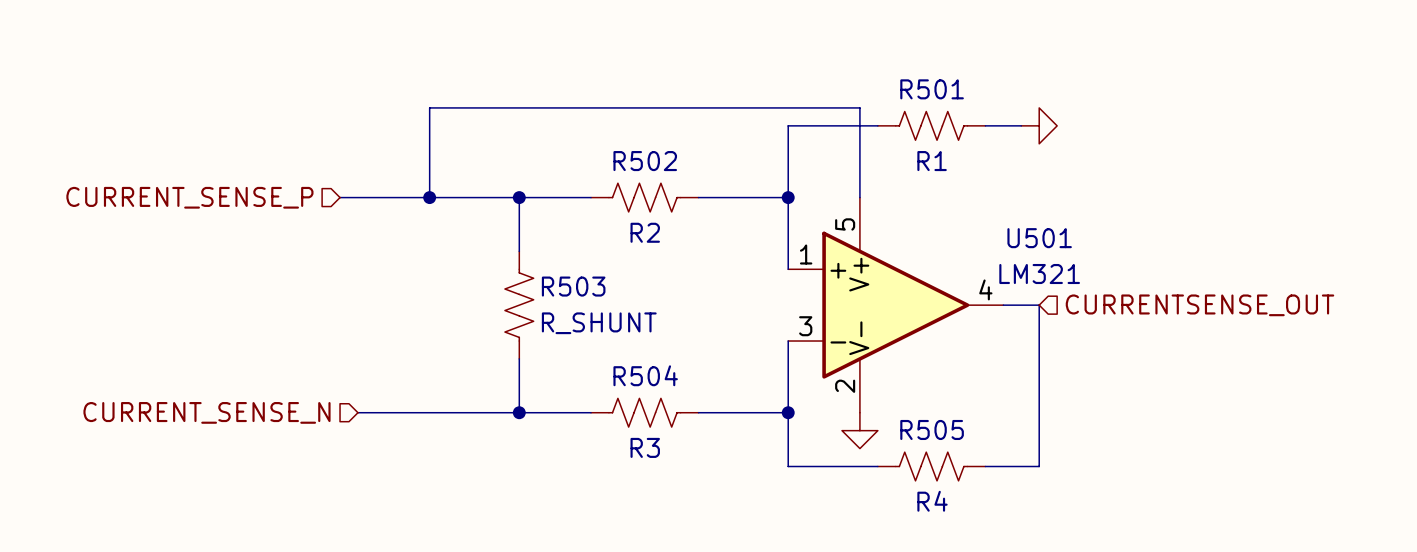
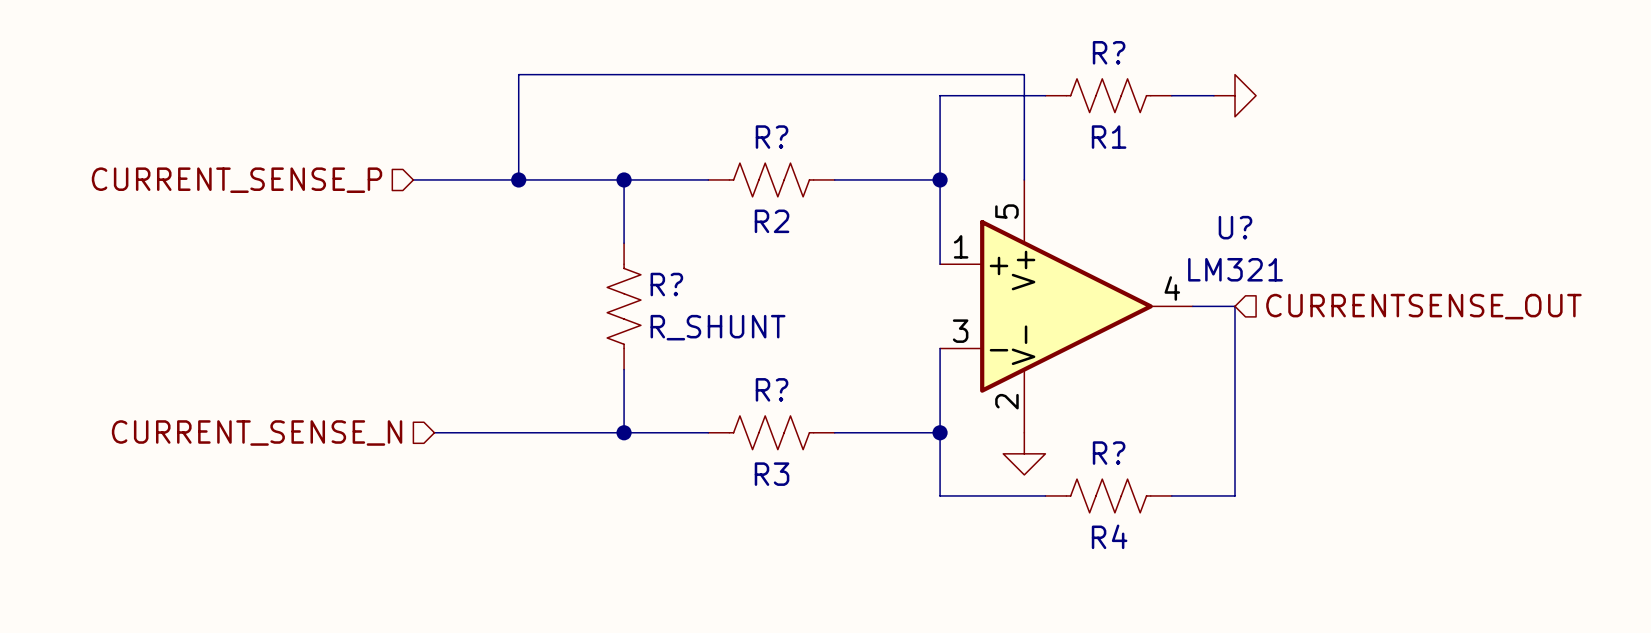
R501 name: R501 (932, 89) -> R? (1109, 52)
R502 name: R502 (645, 161) -> R? (772, 137)
U501 name: U501 (1039, 238) -> U? (1235, 227)
R503 name: R503 (573, 286) -> R? (666, 284)
R504 name: R504 (645, 375) -> R? (772, 389)
R505 name: R505 (932, 429) -> R? (1109, 453)

